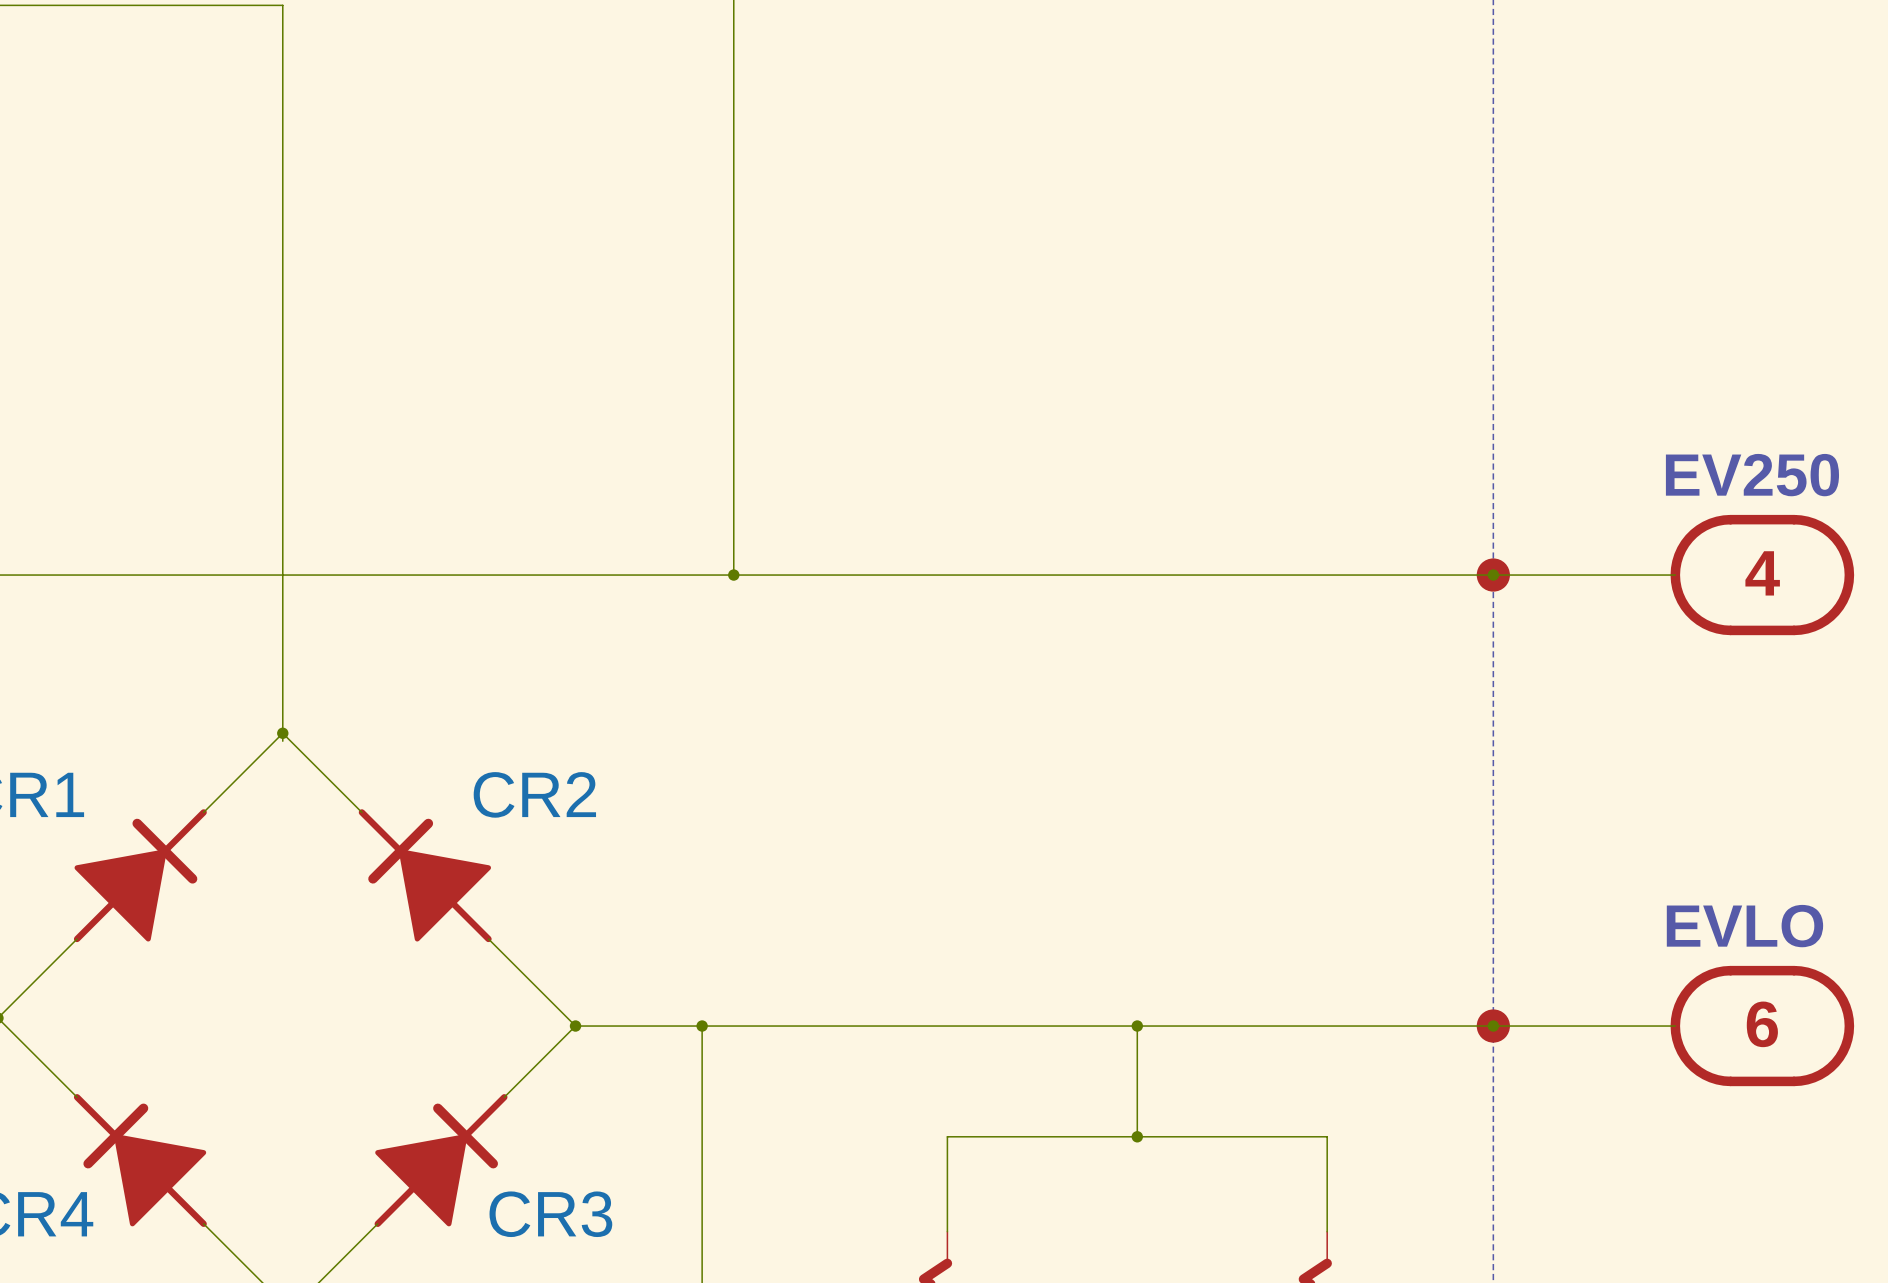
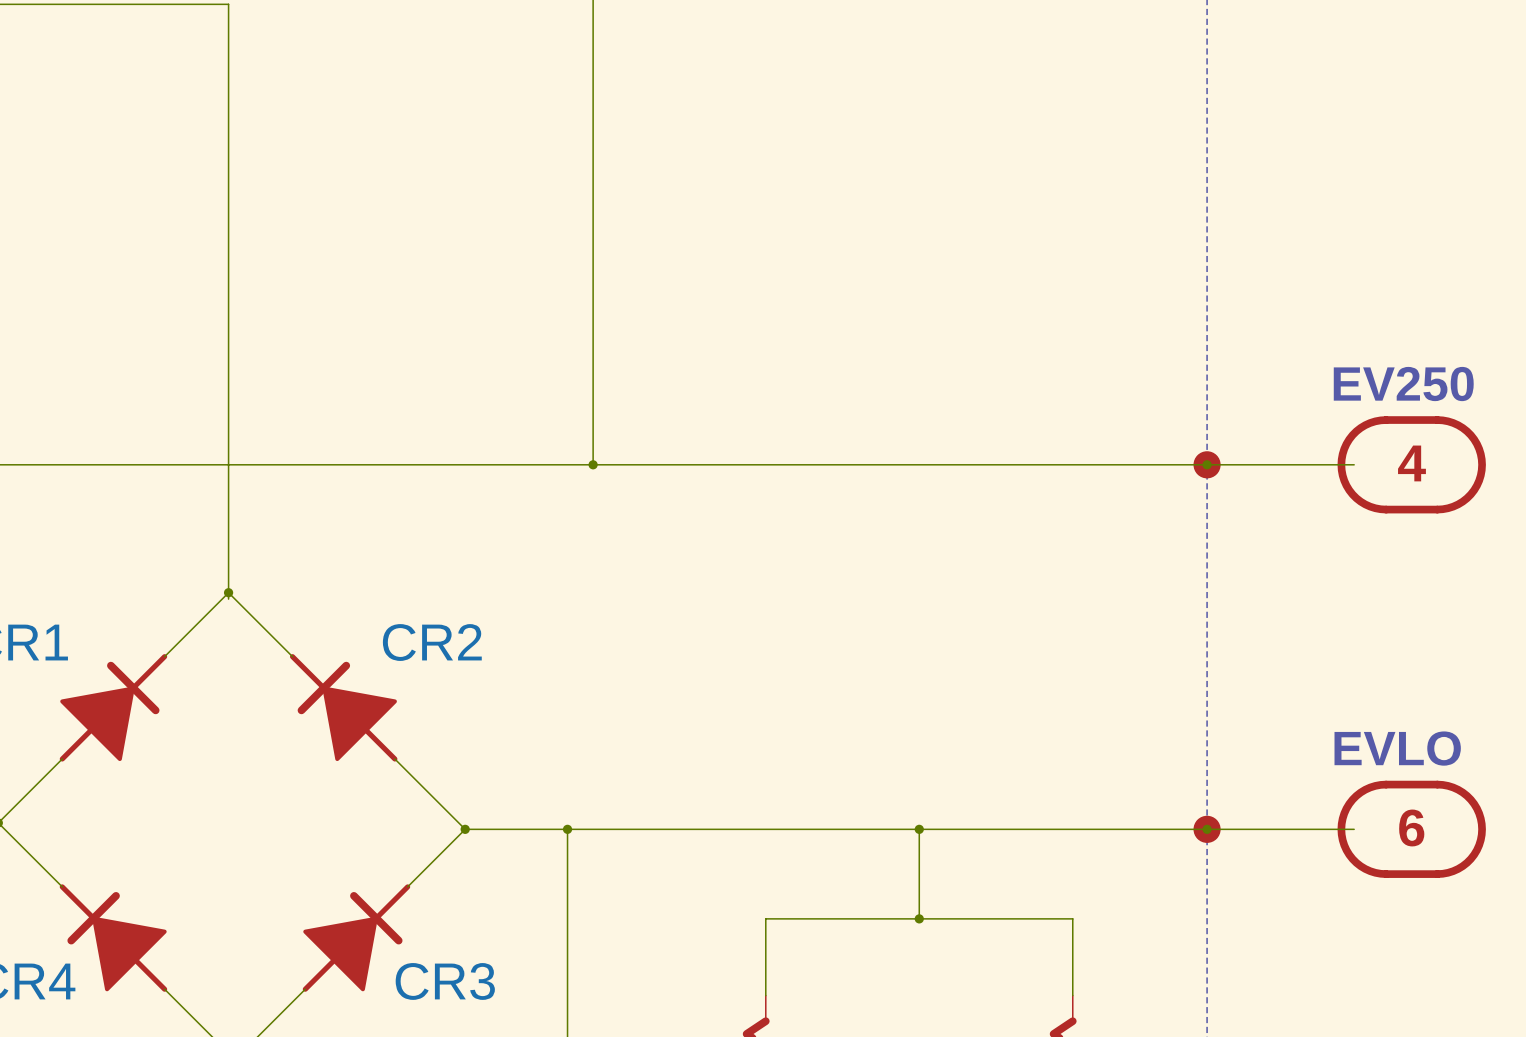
text position: EV250 (1752, 475) -> EV250 (1403, 384)
part position: (1762, 575) -> (1411, 464)
text position: EVLO (1744, 926) -> EVLO (1397, 748)
part position: (1762, 1026) -> (1411, 829)

